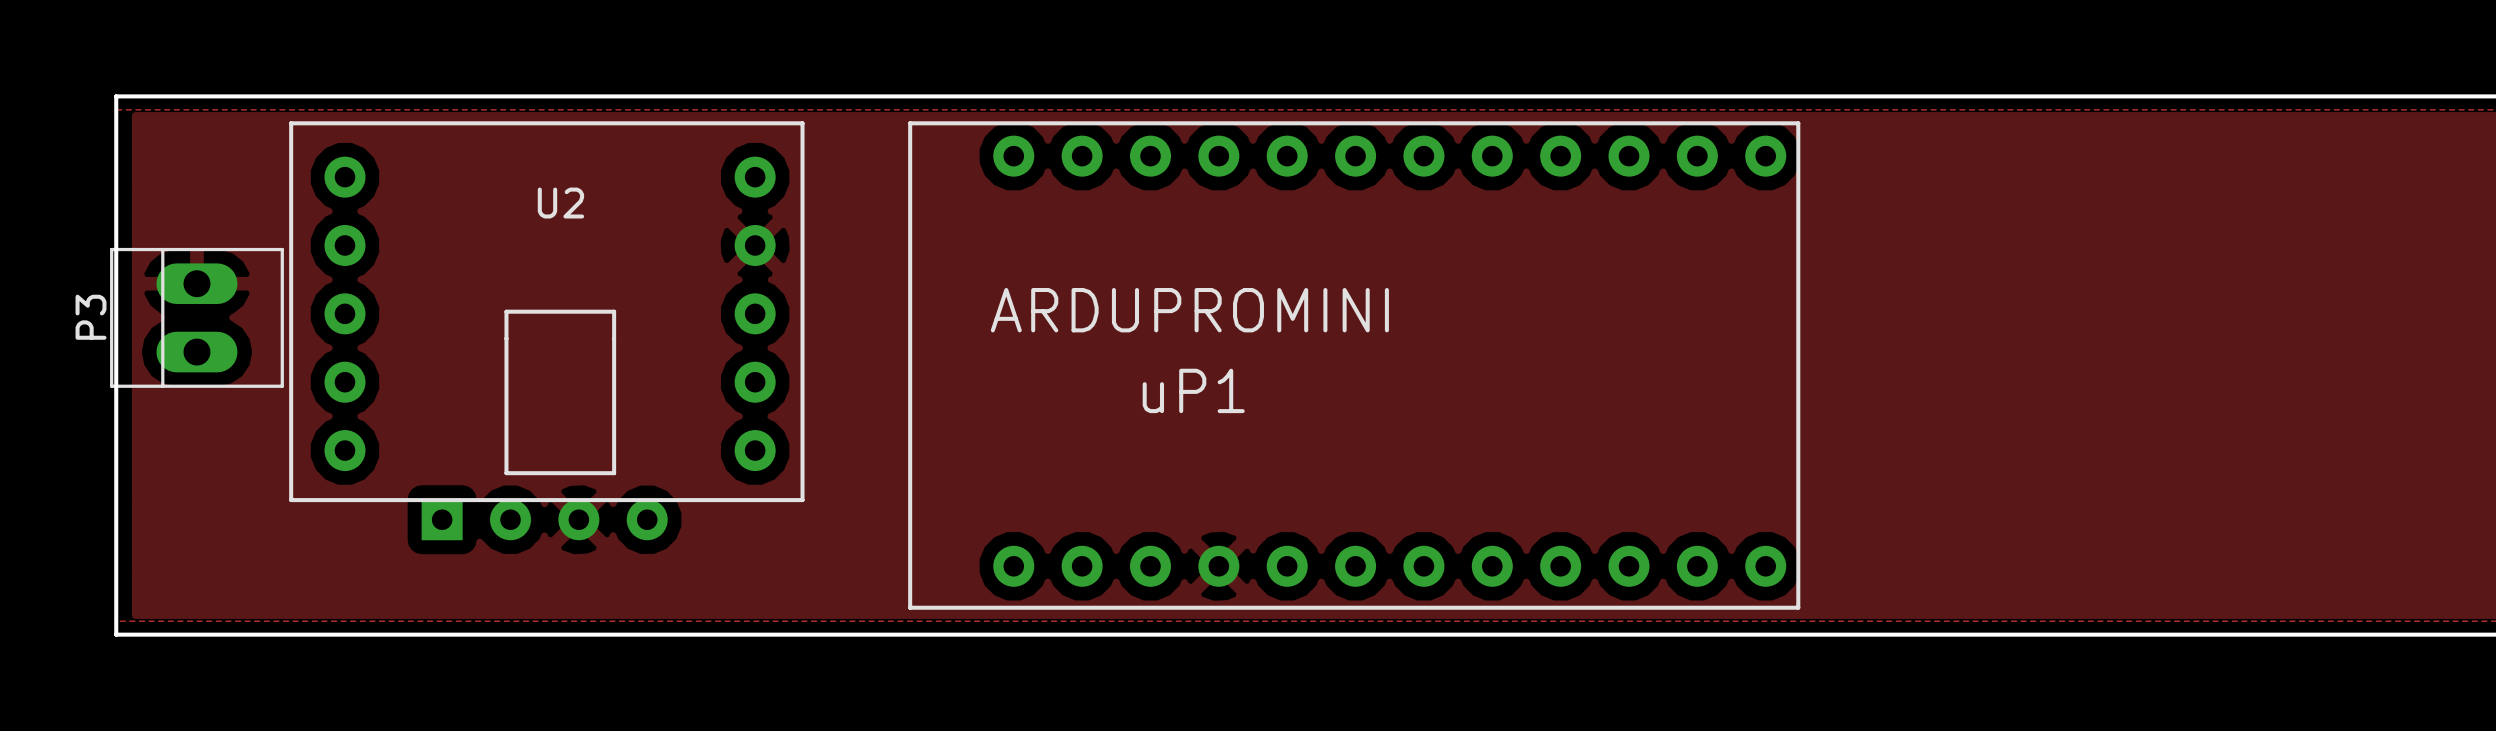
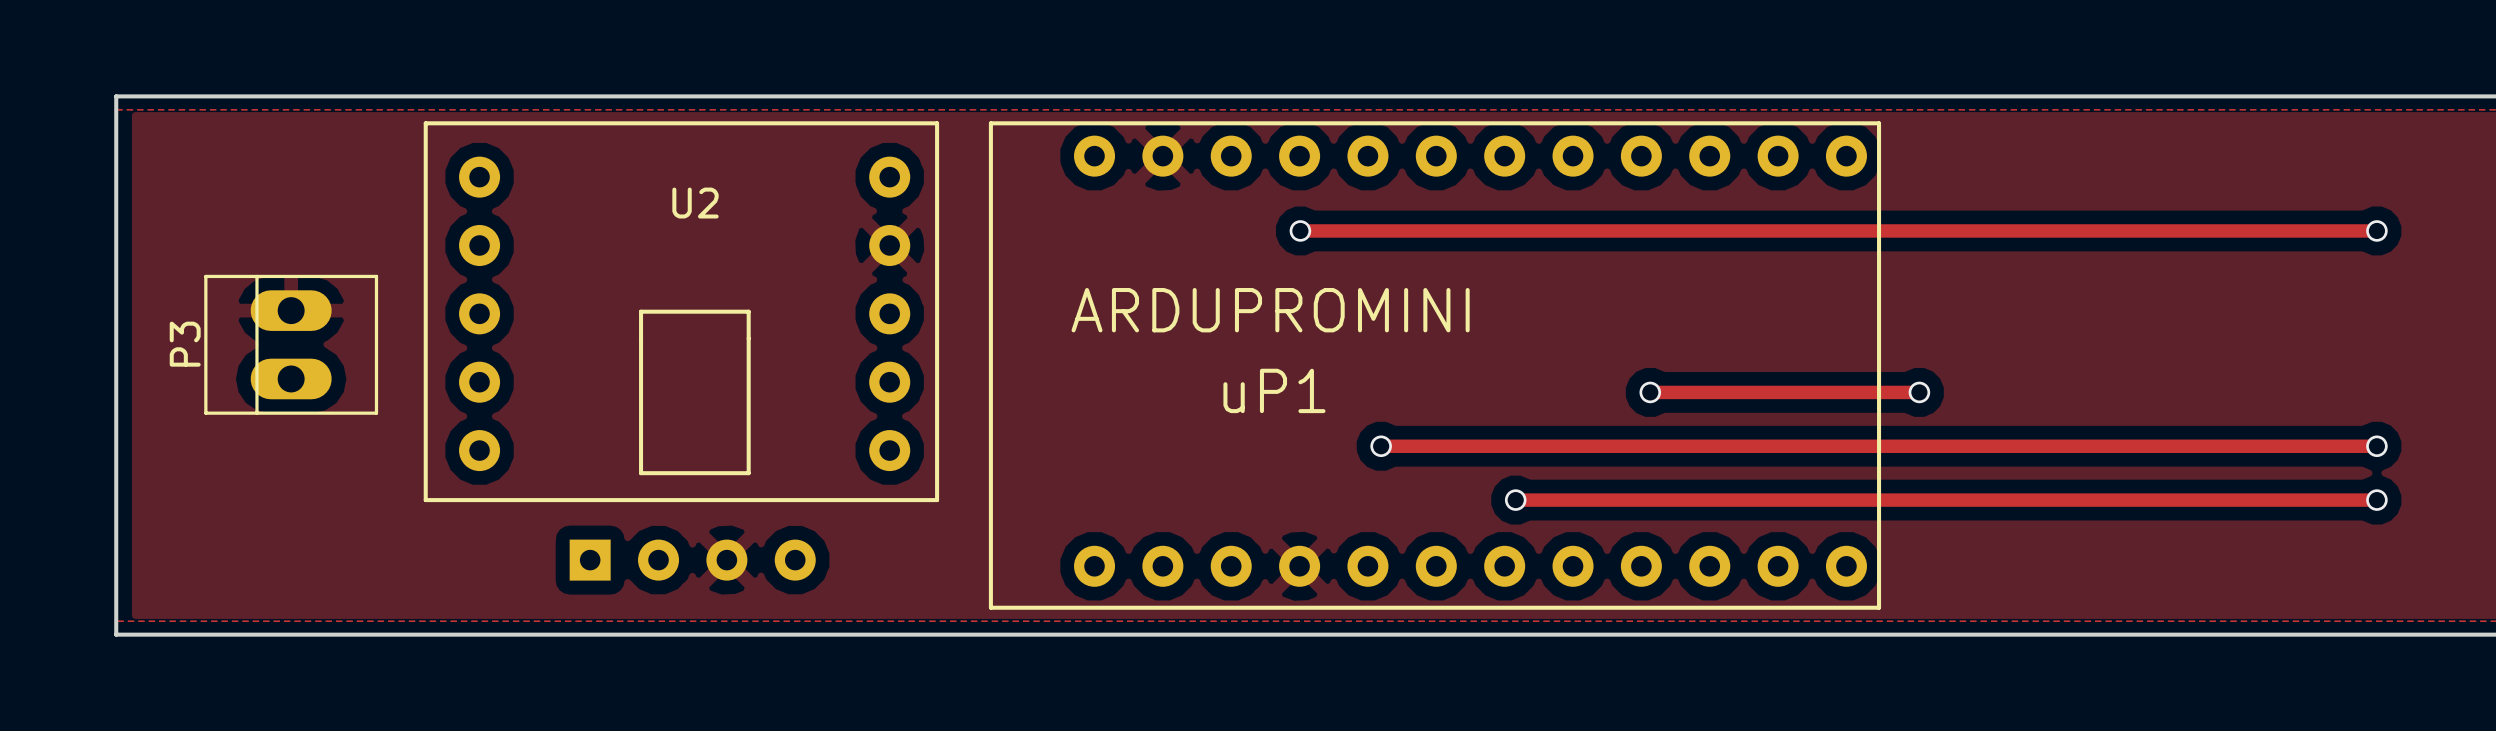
track: none -> (1300, 230) (2376, 230)
via: none -> (1300, 230)
via: none -> (2376, 230)
U2 position: (546, 311) -> (681, 311)
P3 position: (196, 317) -> (291, 344)
uP1 position: (1354, 365) -> (1434, 365)
track: none -> (1650, 392) (1919, 392)
via: none -> (1650, 392)
via: none -> (1919, 392)
track: none -> (1381, 446) (2376, 446)
via: none -> (1381, 446)
via: none -> (2376, 446)
track: none -> (1515, 500) (2376, 500)
via: none -> (1515, 500)
via: none -> (2376, 500)
part position: (544, 519) -> (692, 560)

